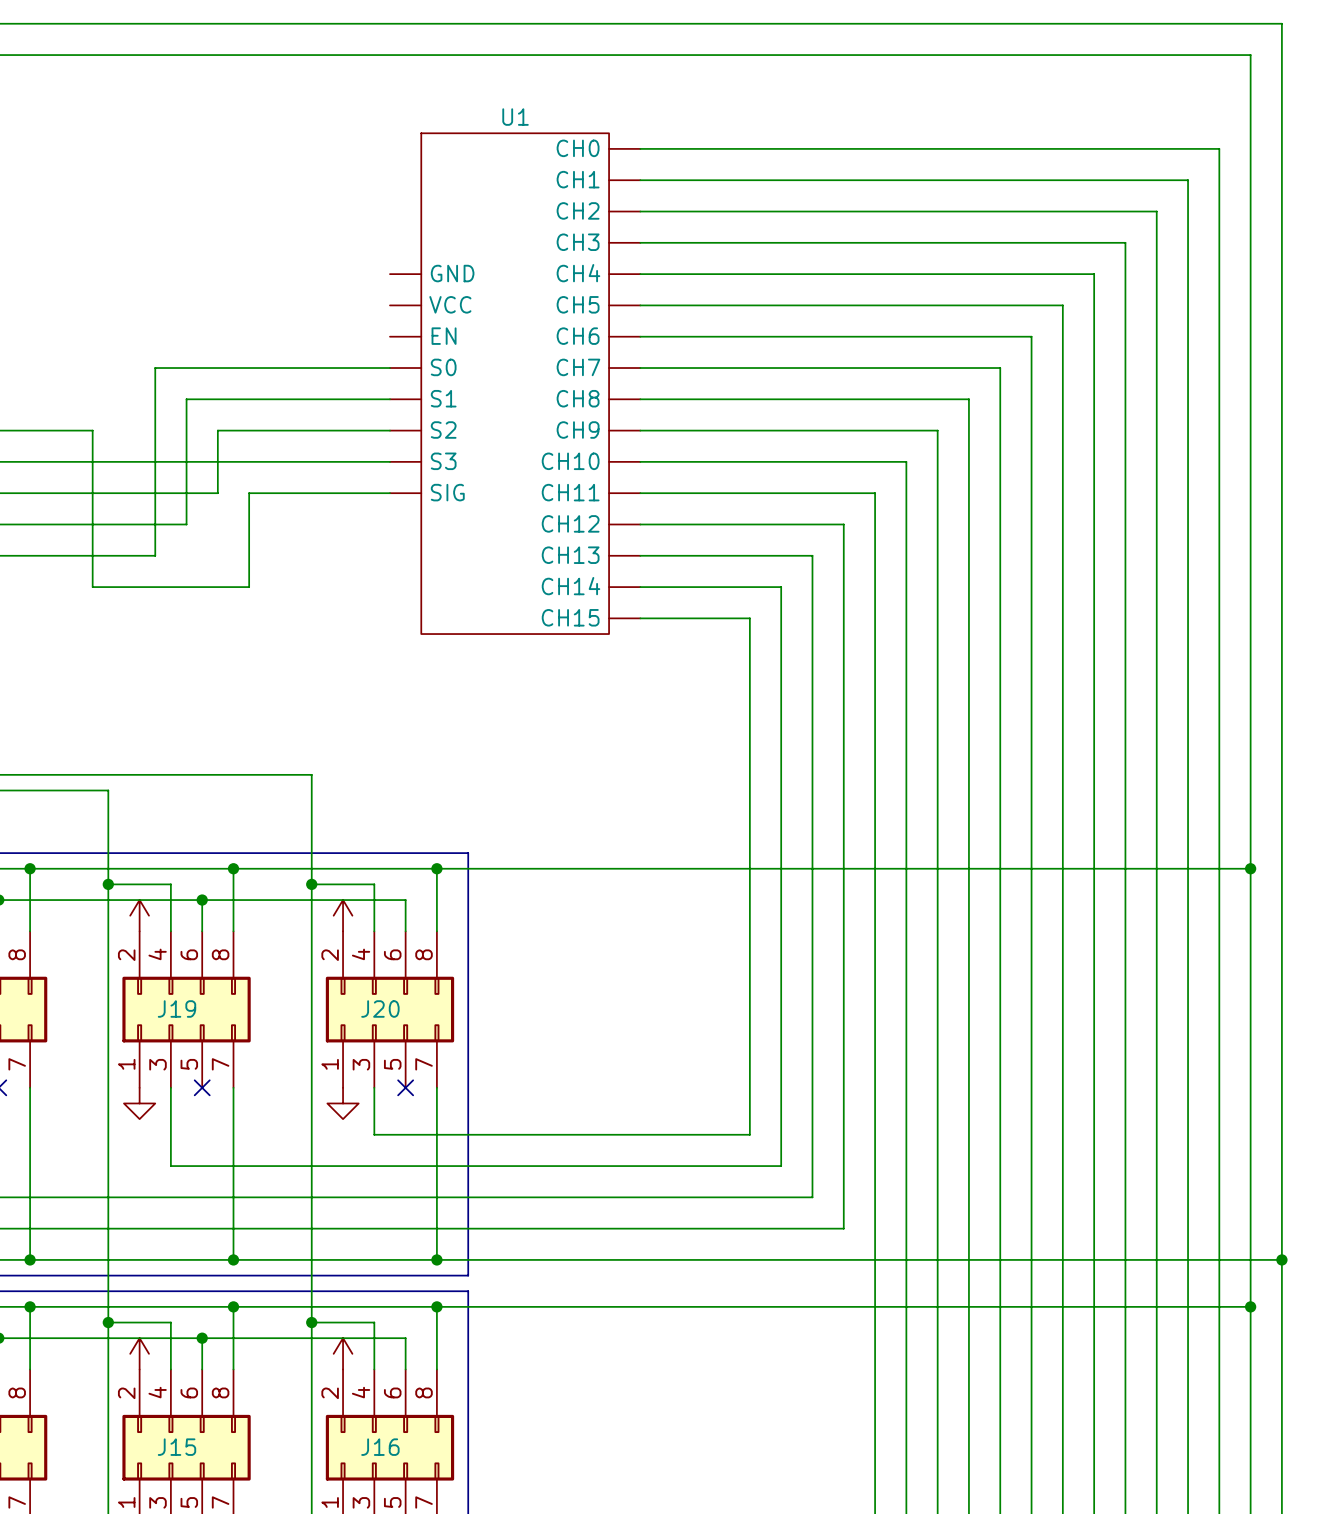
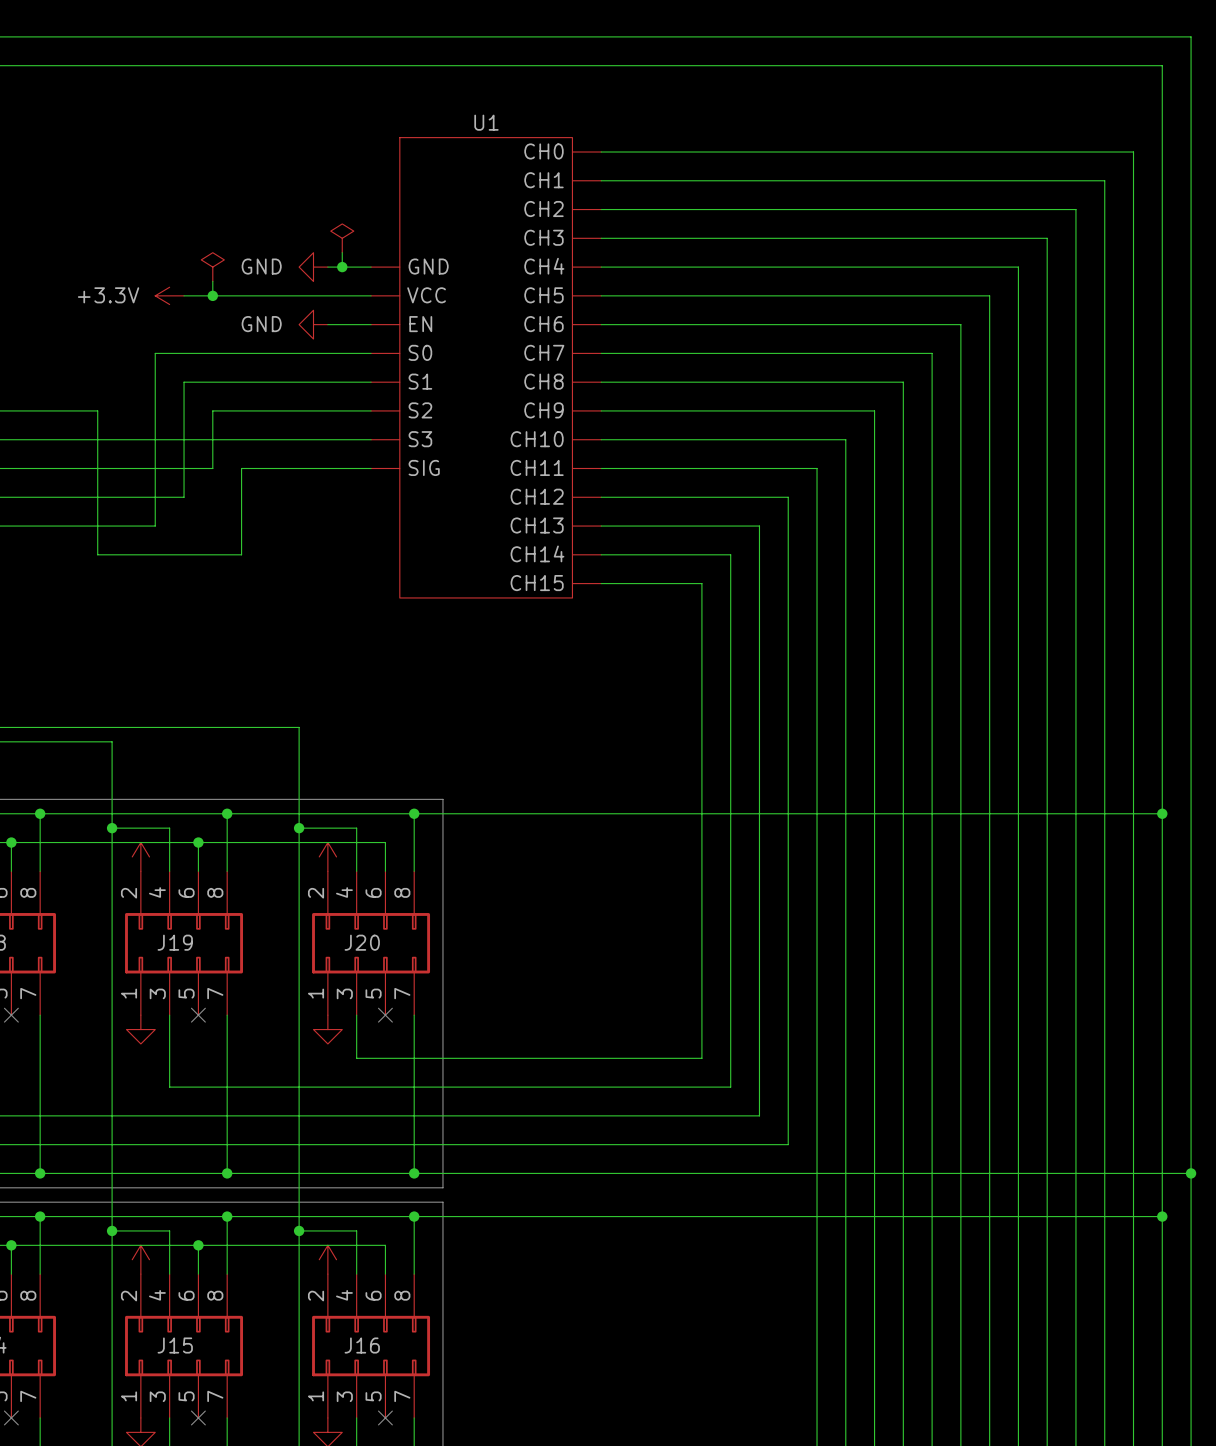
power symbol: none -> (342, 238)
wire: none -> (342, 252) (342, 267)
power symbol: none -> (212, 267)
power symbol: none -> GND (313, 267)
wire: none -> (327, 267) (371, 267)
junction: none -> (342, 267)
wire: none -> (212, 281) (212, 295)
power symbol: none -> +3.3V (169, 295)
wire: none -> (184, 295) (371, 295)
junction: none -> (212, 295)
power symbol: none -> GND (313, 324)
wire: none -> (327, 324) (371, 324)

